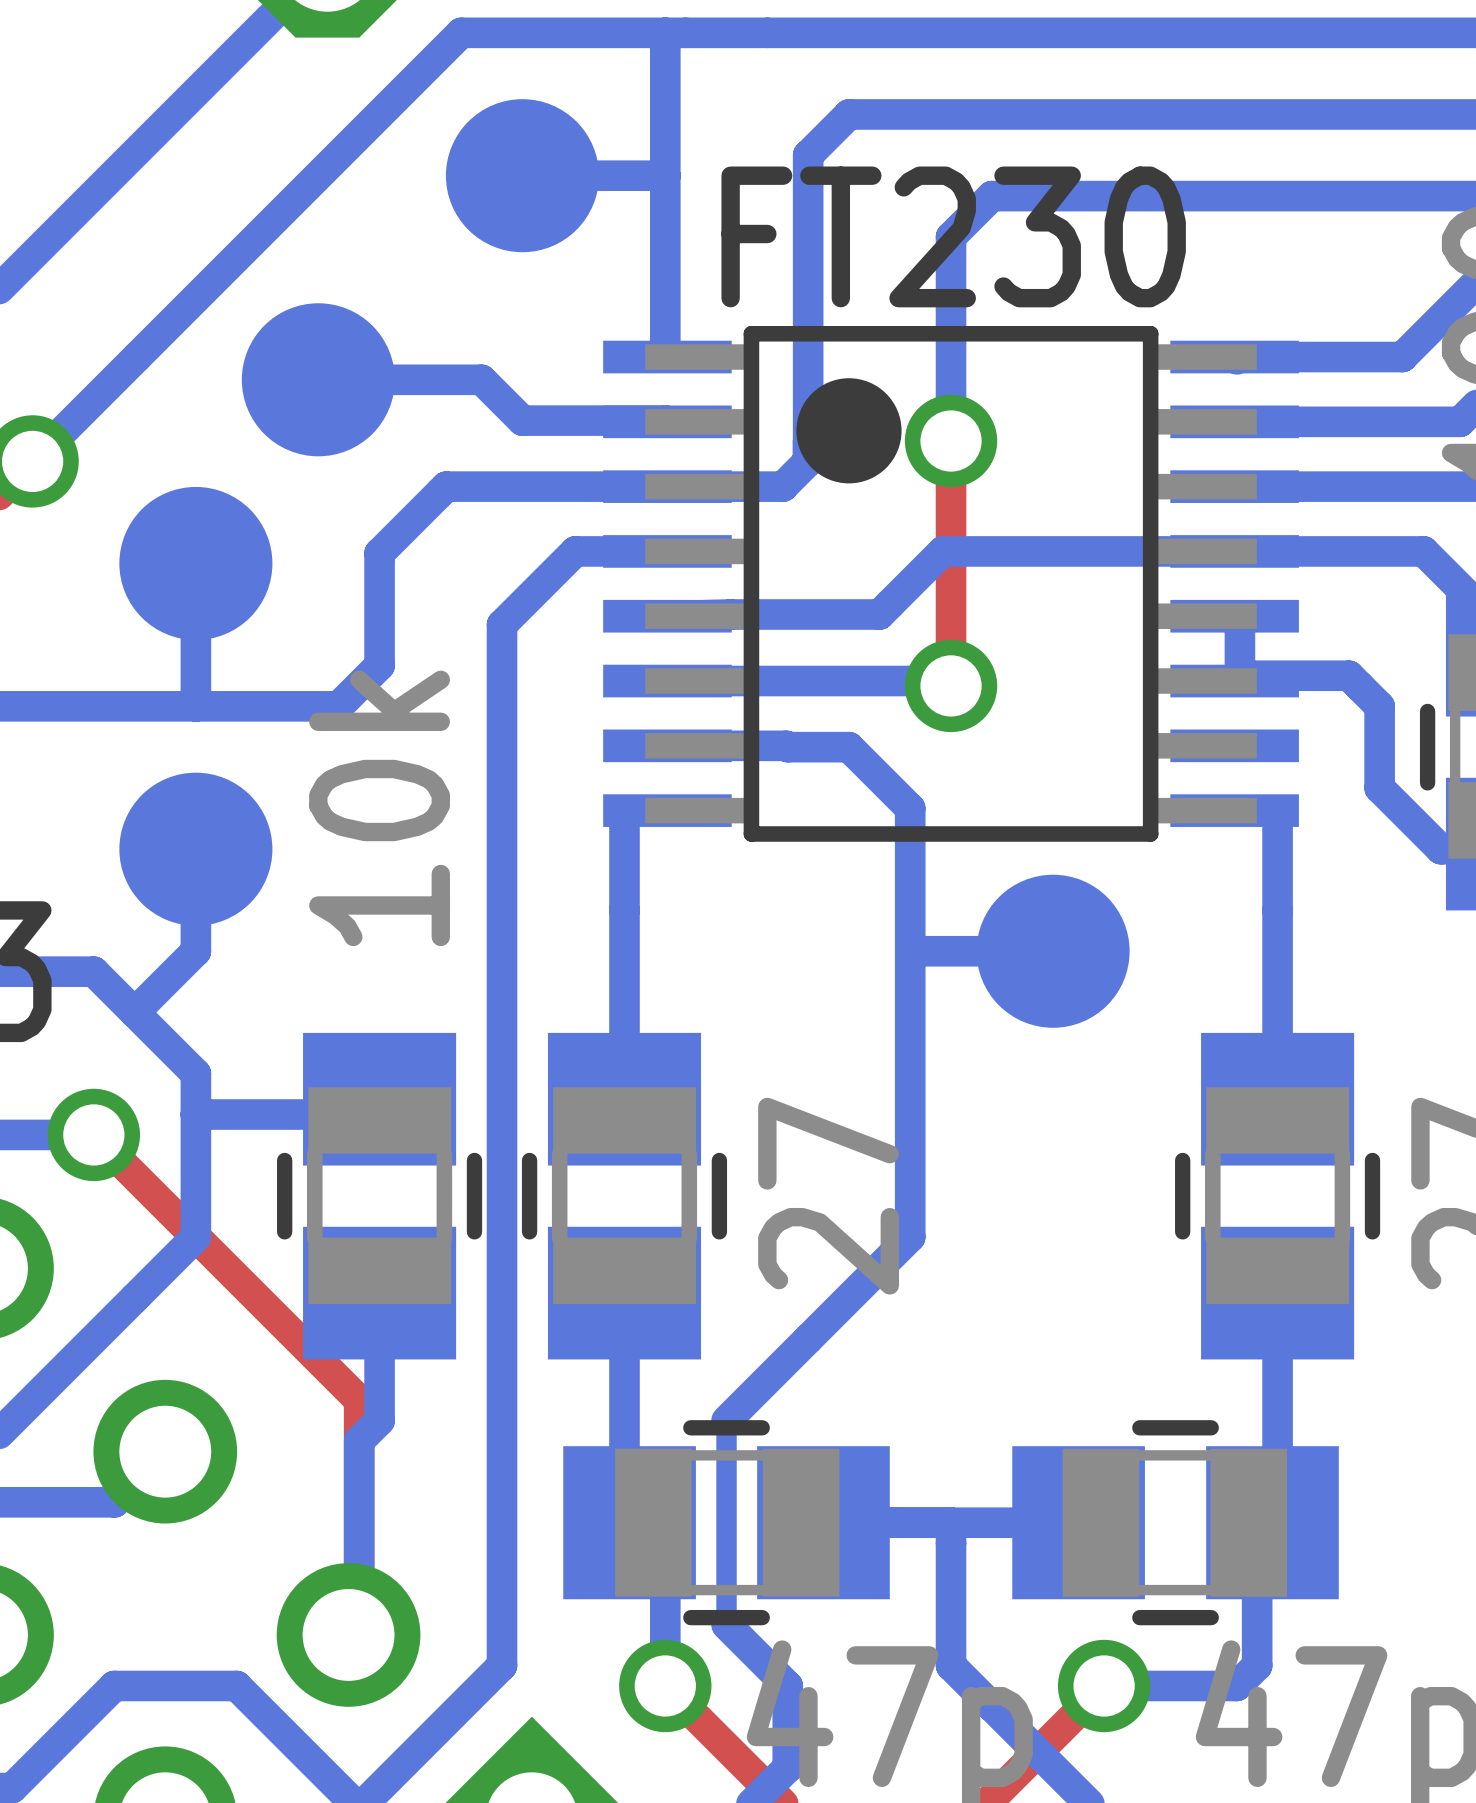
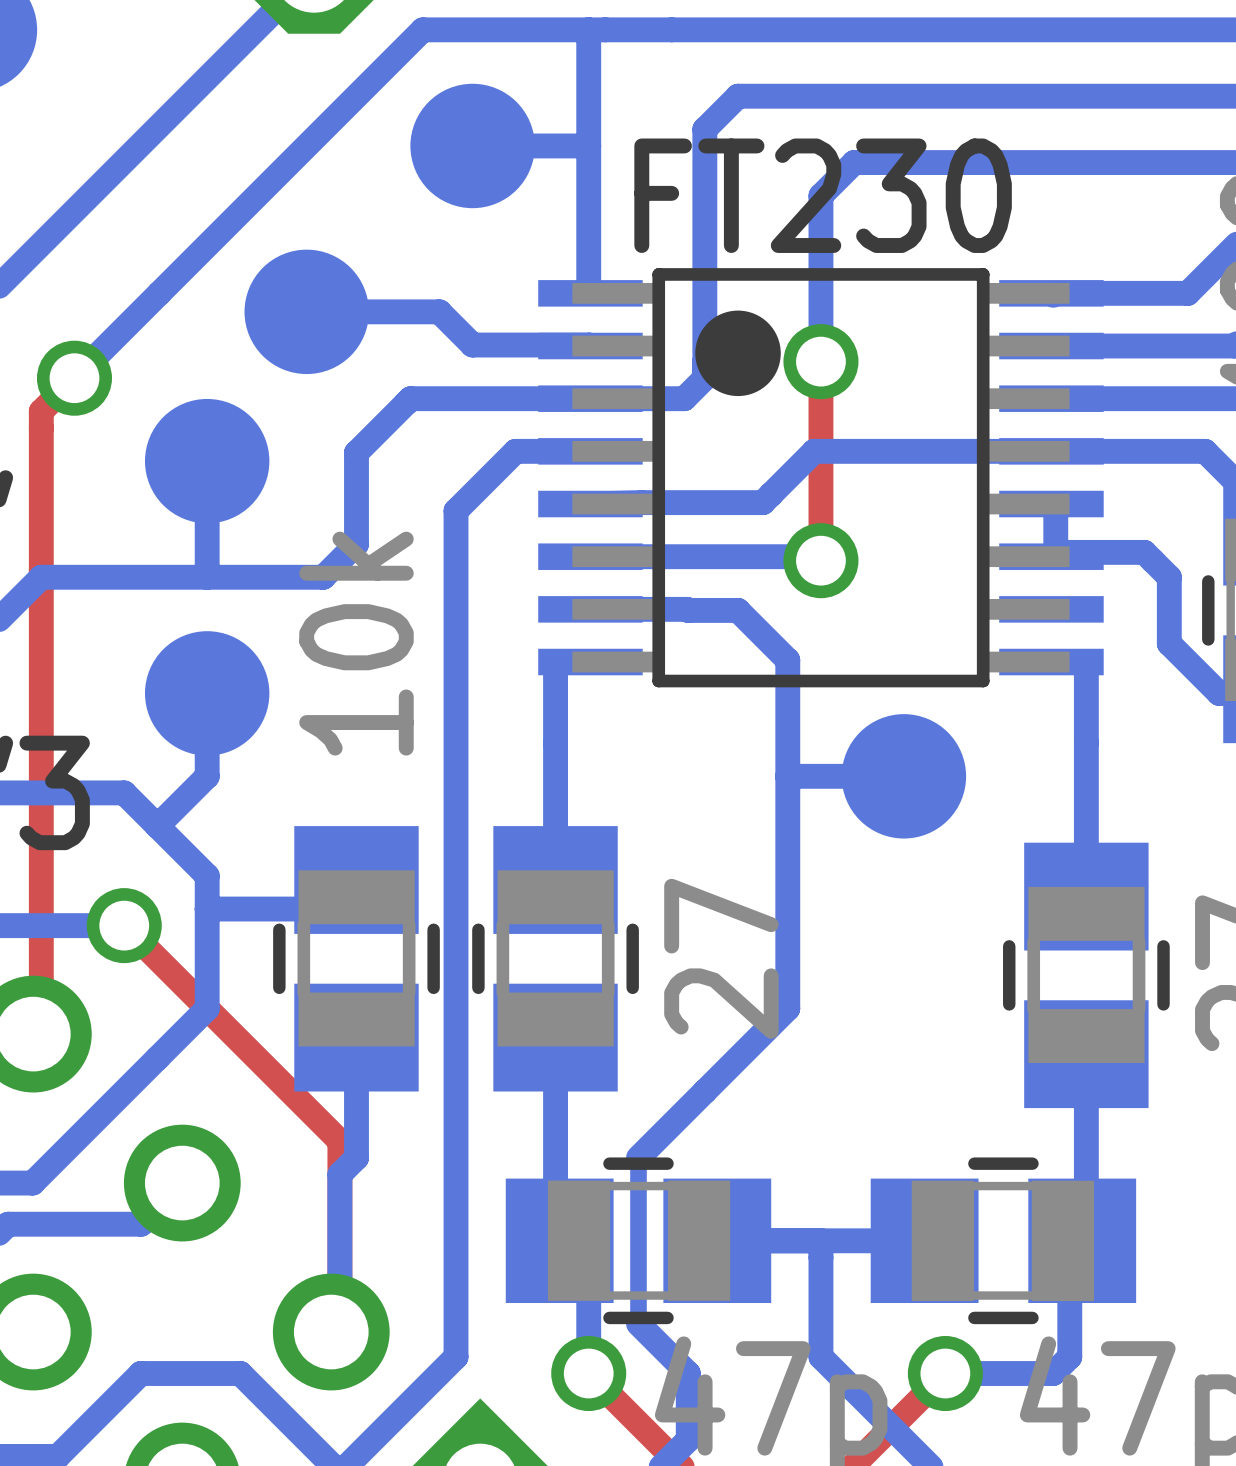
part position: (379, 1196) -> (356, 958)
part position: (624, 1196) -> (555, 958)

